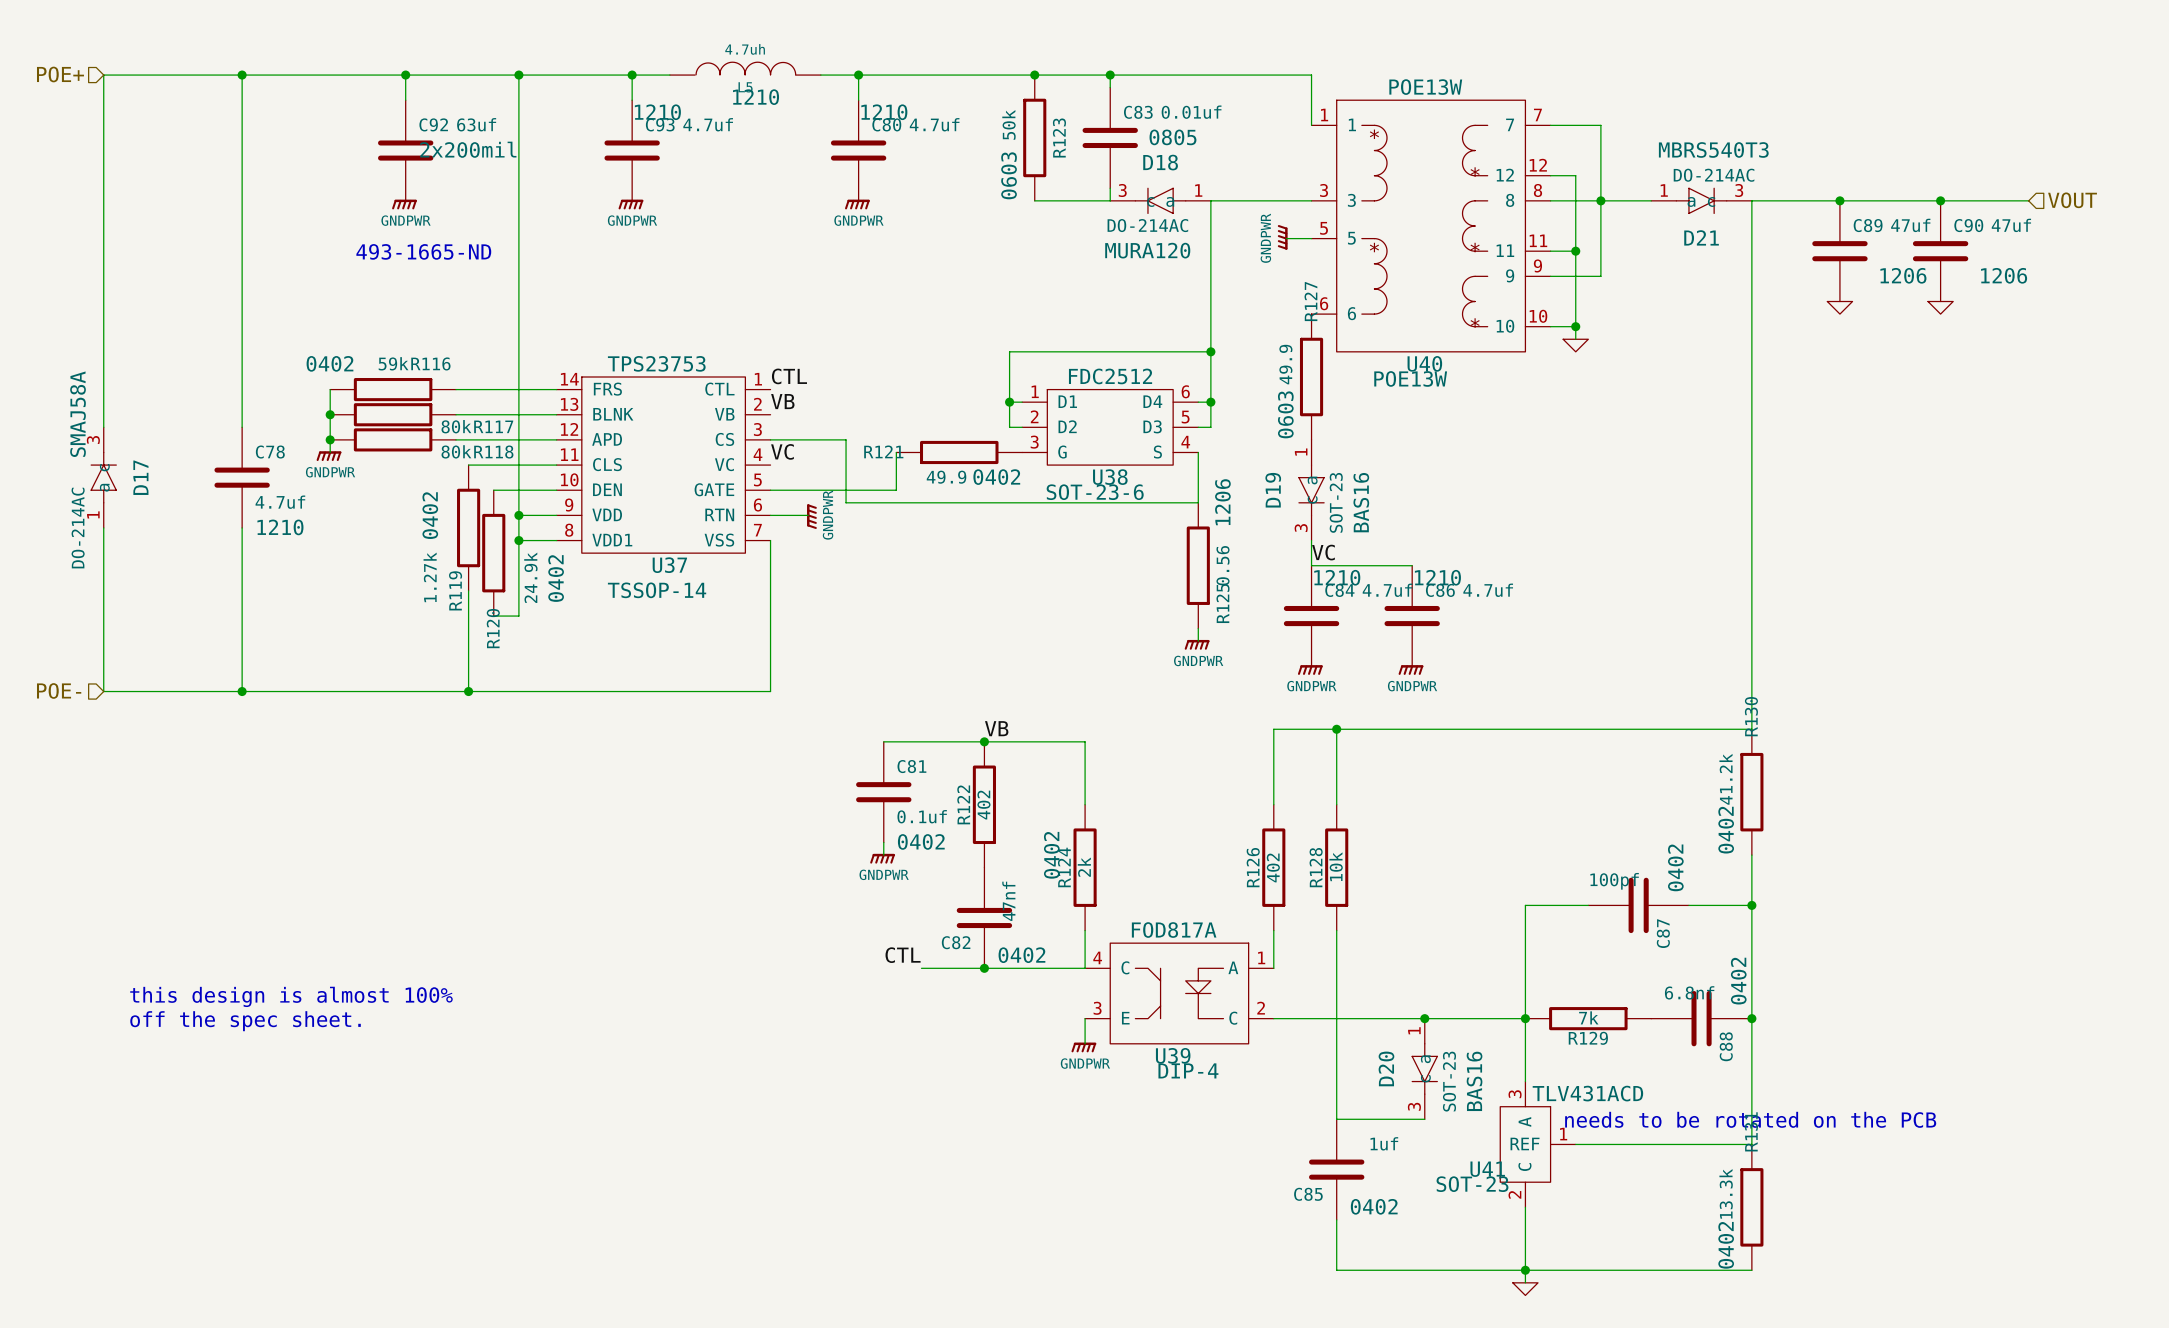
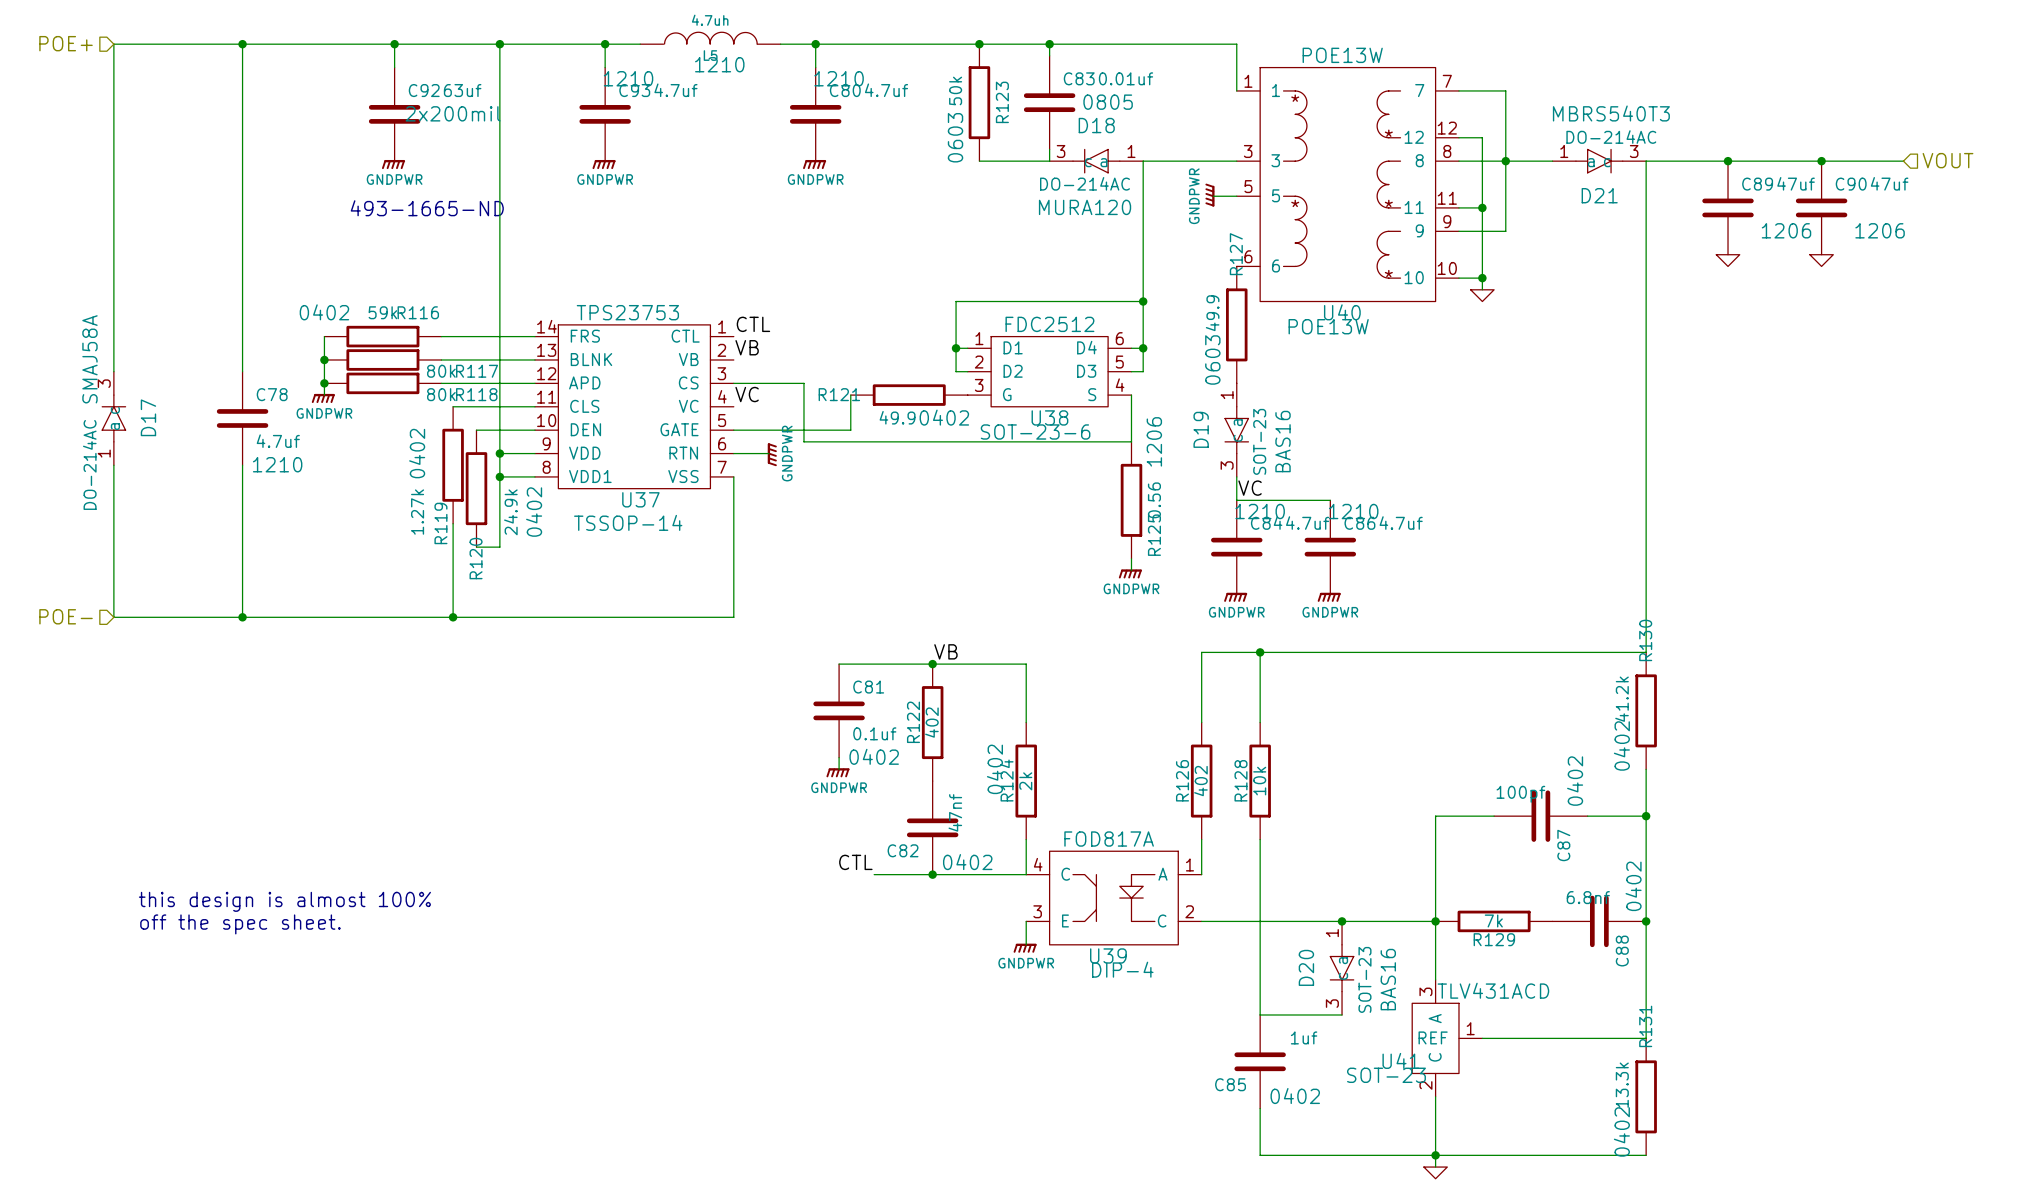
text: needs to be rotated on the PCB (1750, 1119) -> none

